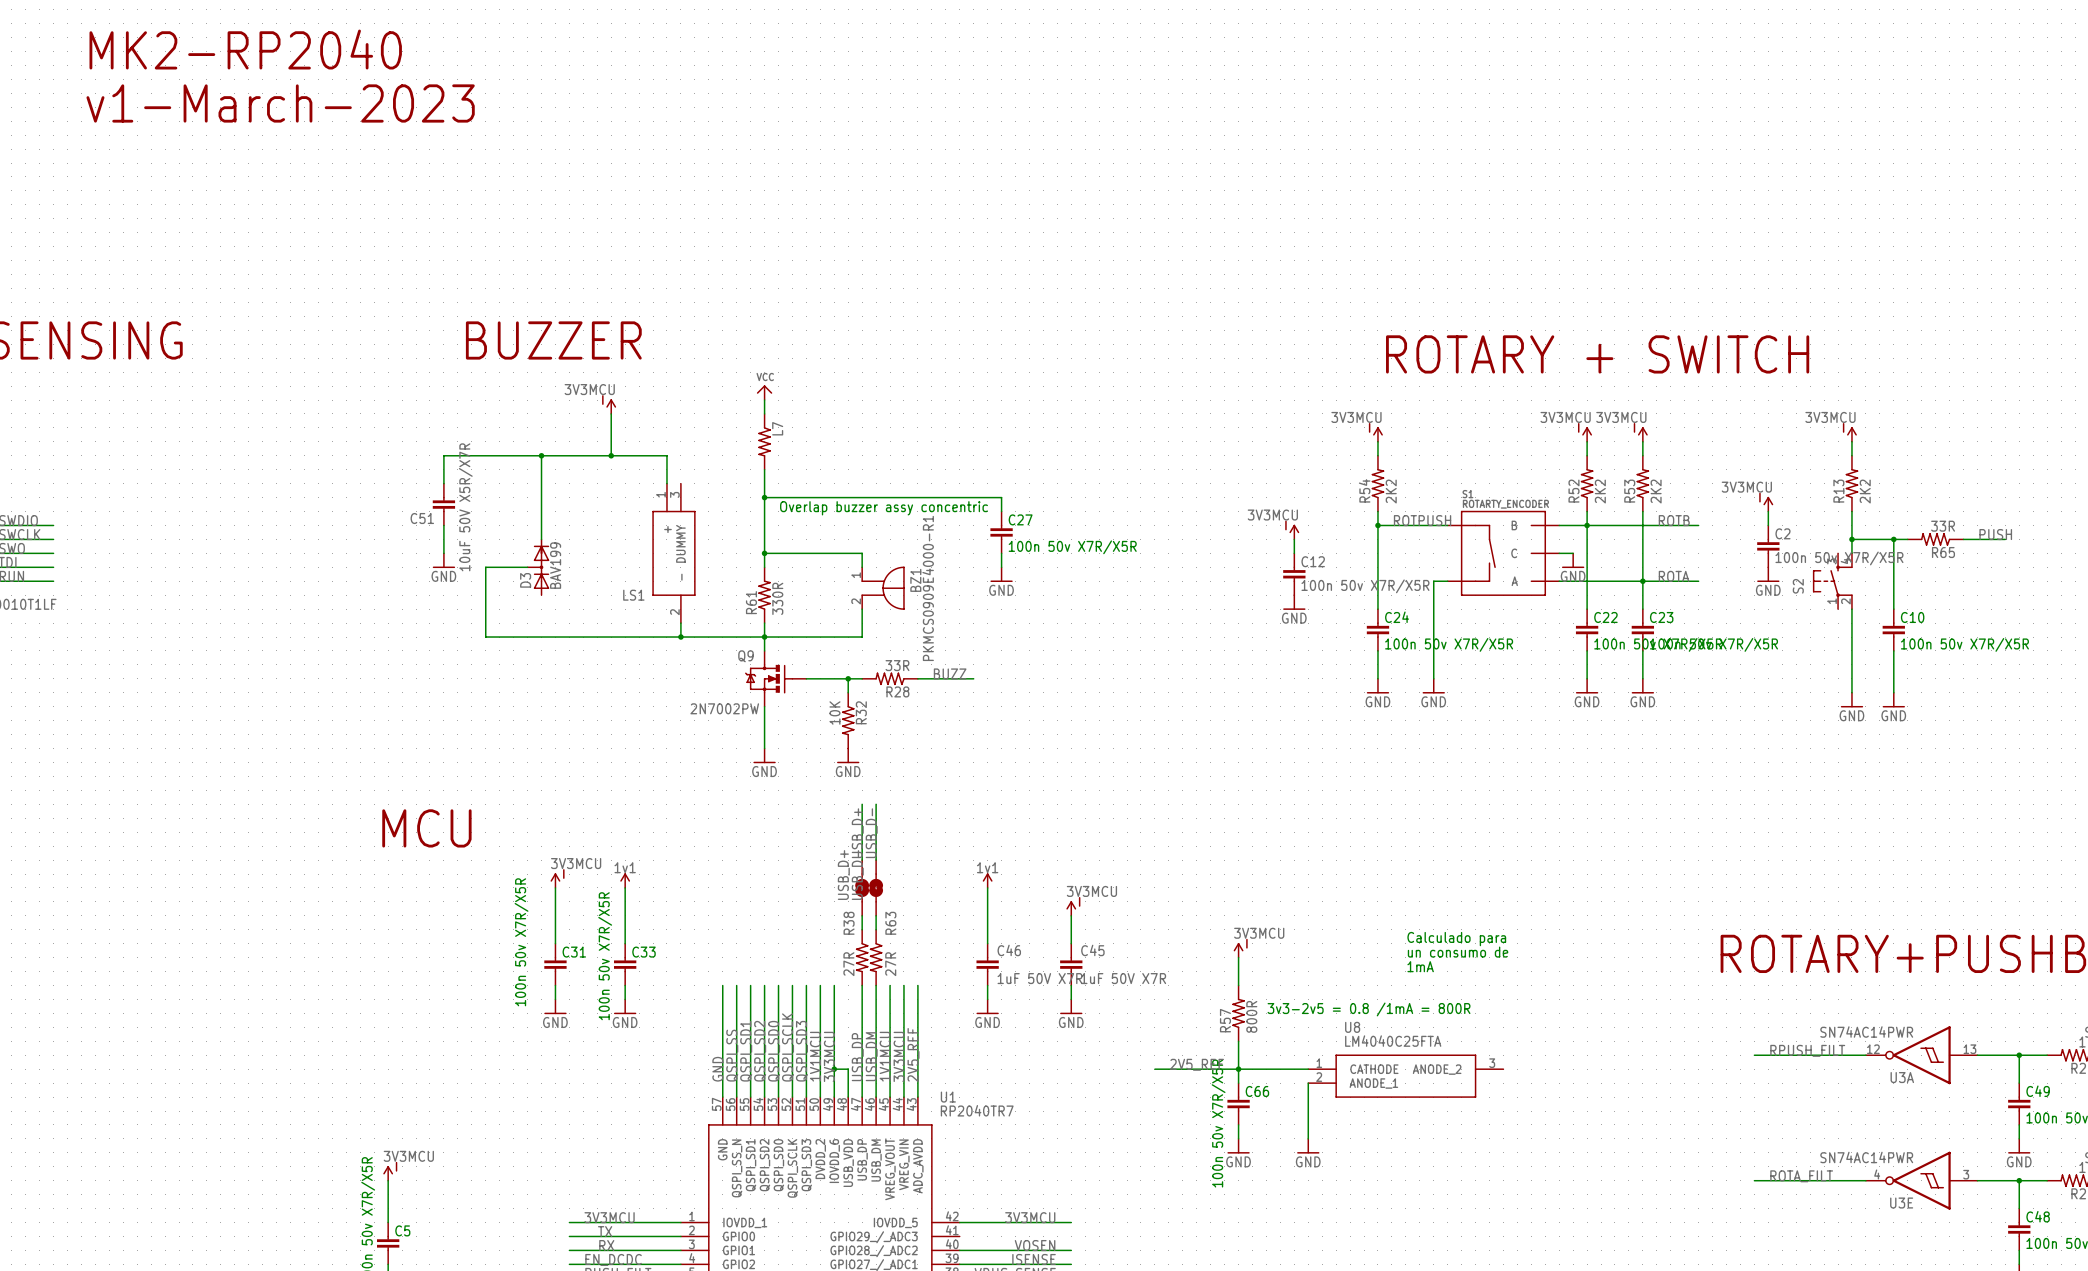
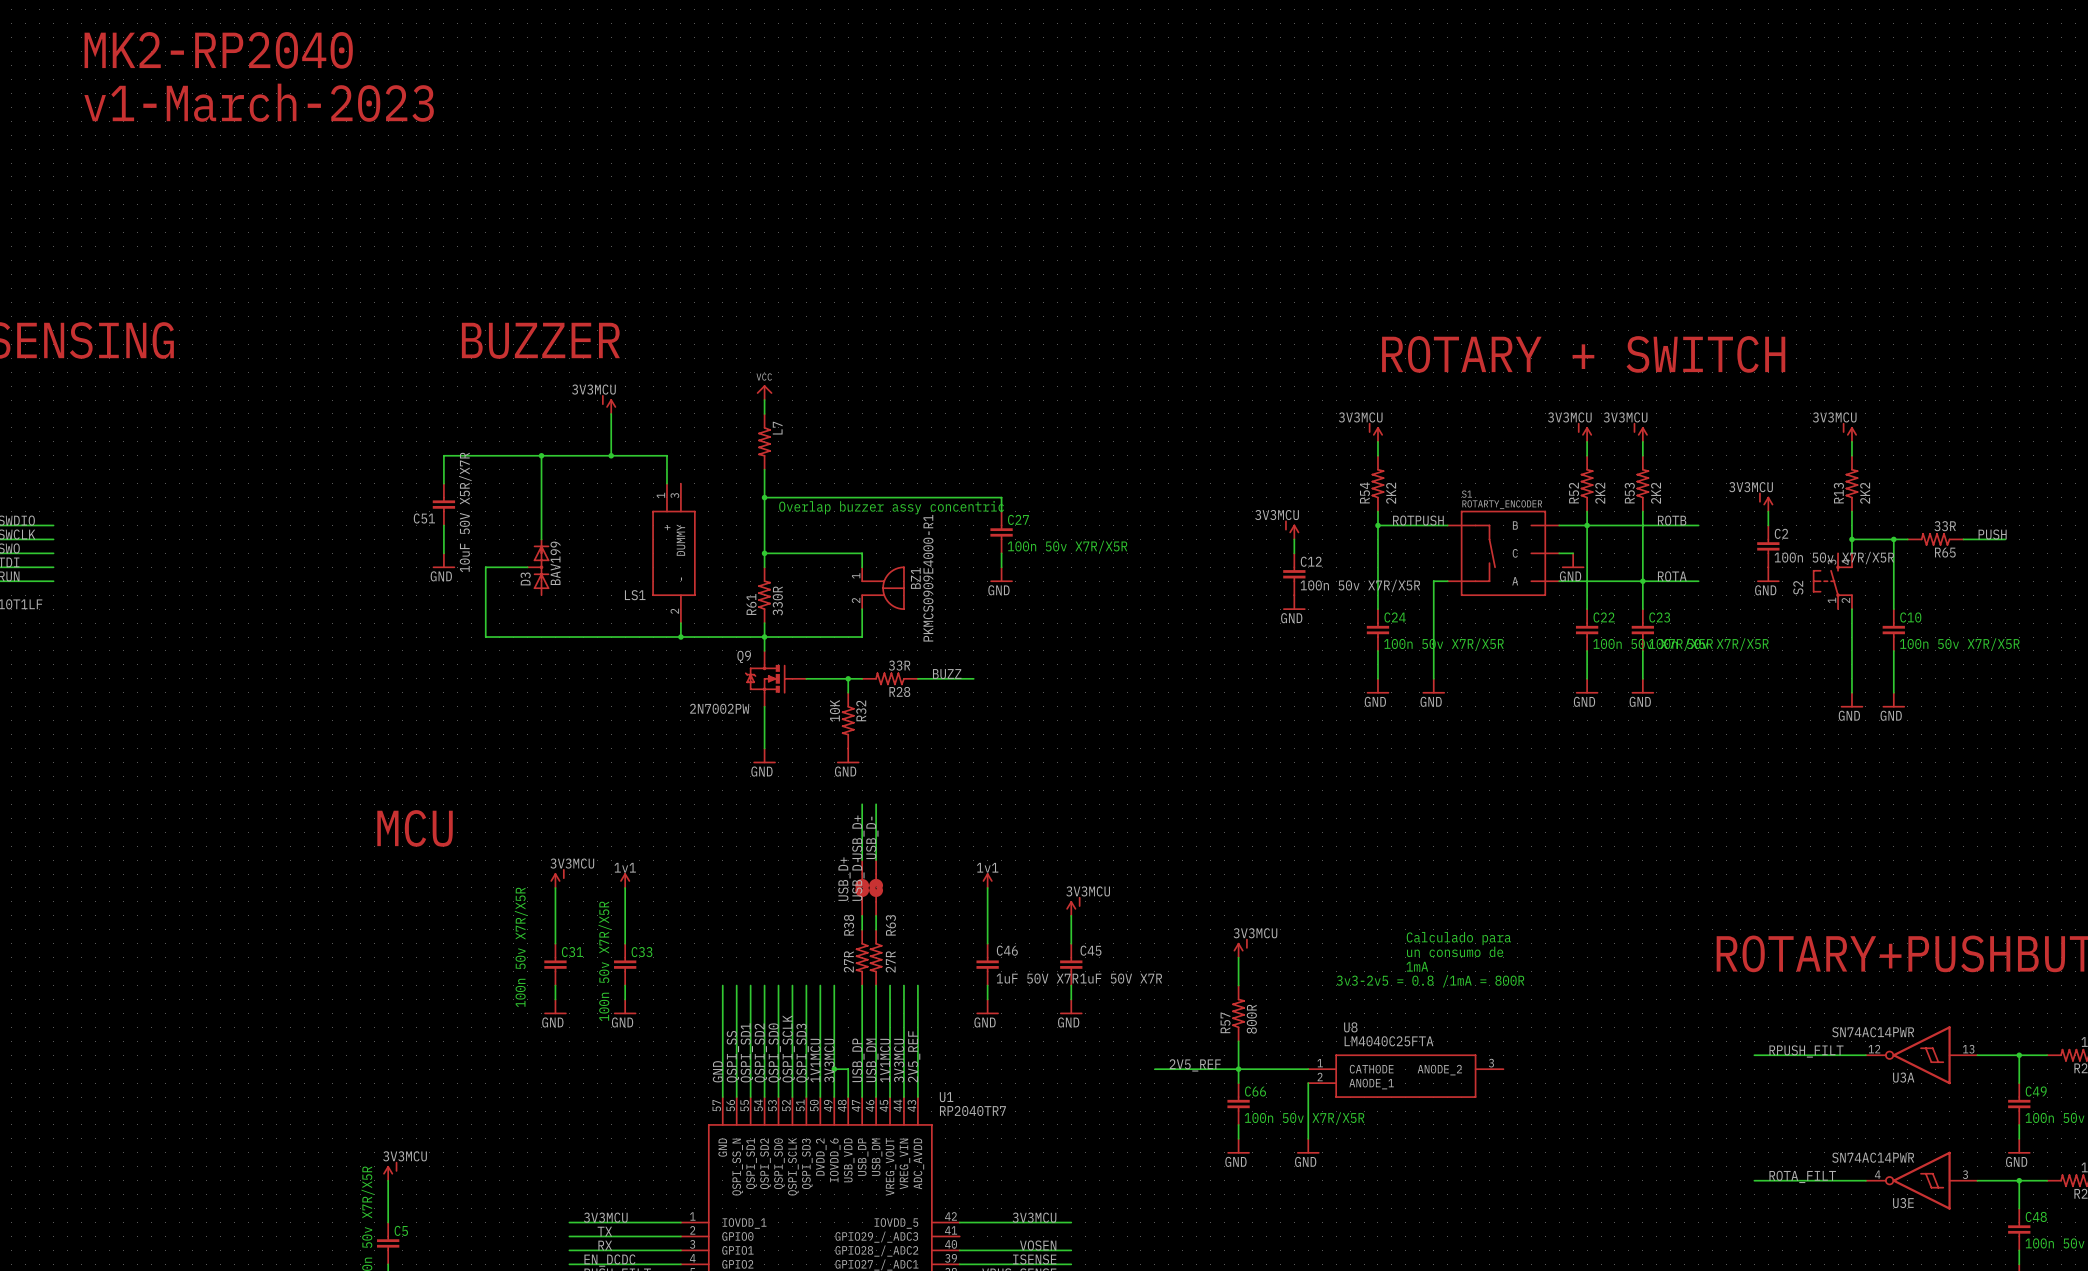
text position: 3v3-2v5 = 0.8 /1mA = 800R (1369, 1009) -> 3v3-2v5 = 0.8 /1mA = 800R (1430, 981)
C66 value rotation: 0° (1218, 1123) -> 90° clockwise (1304, 1118)

